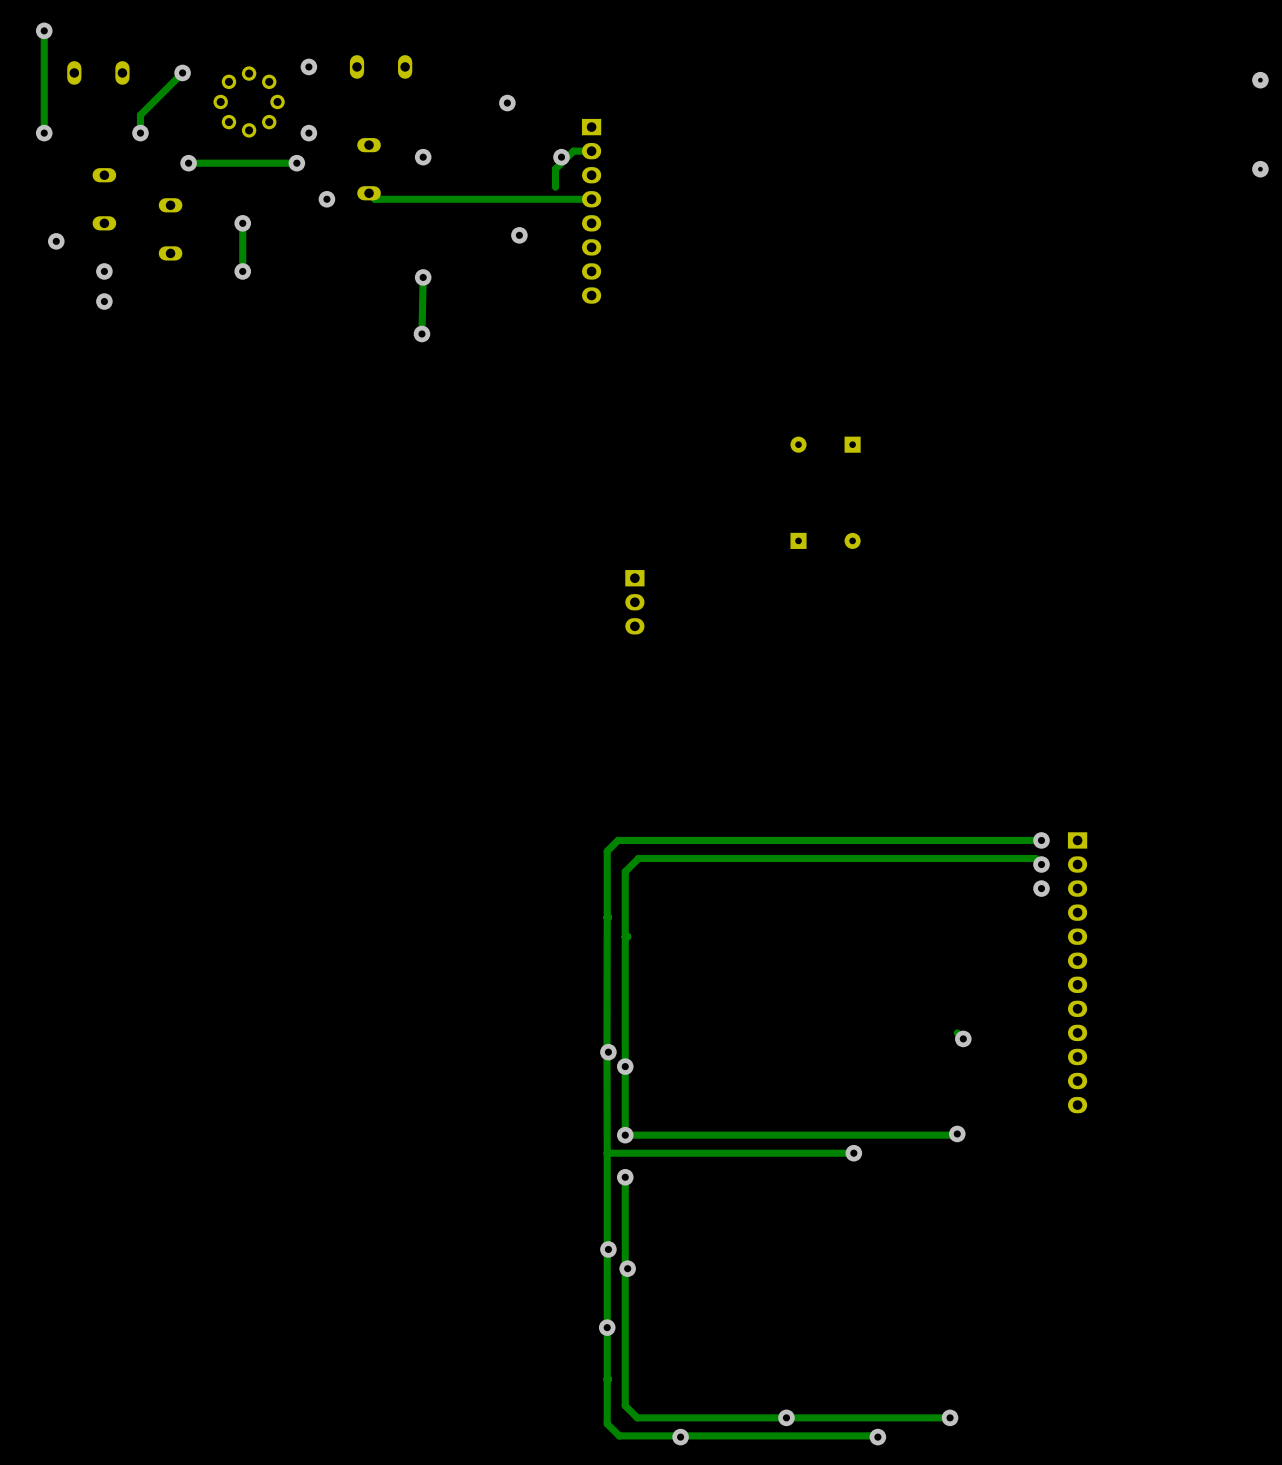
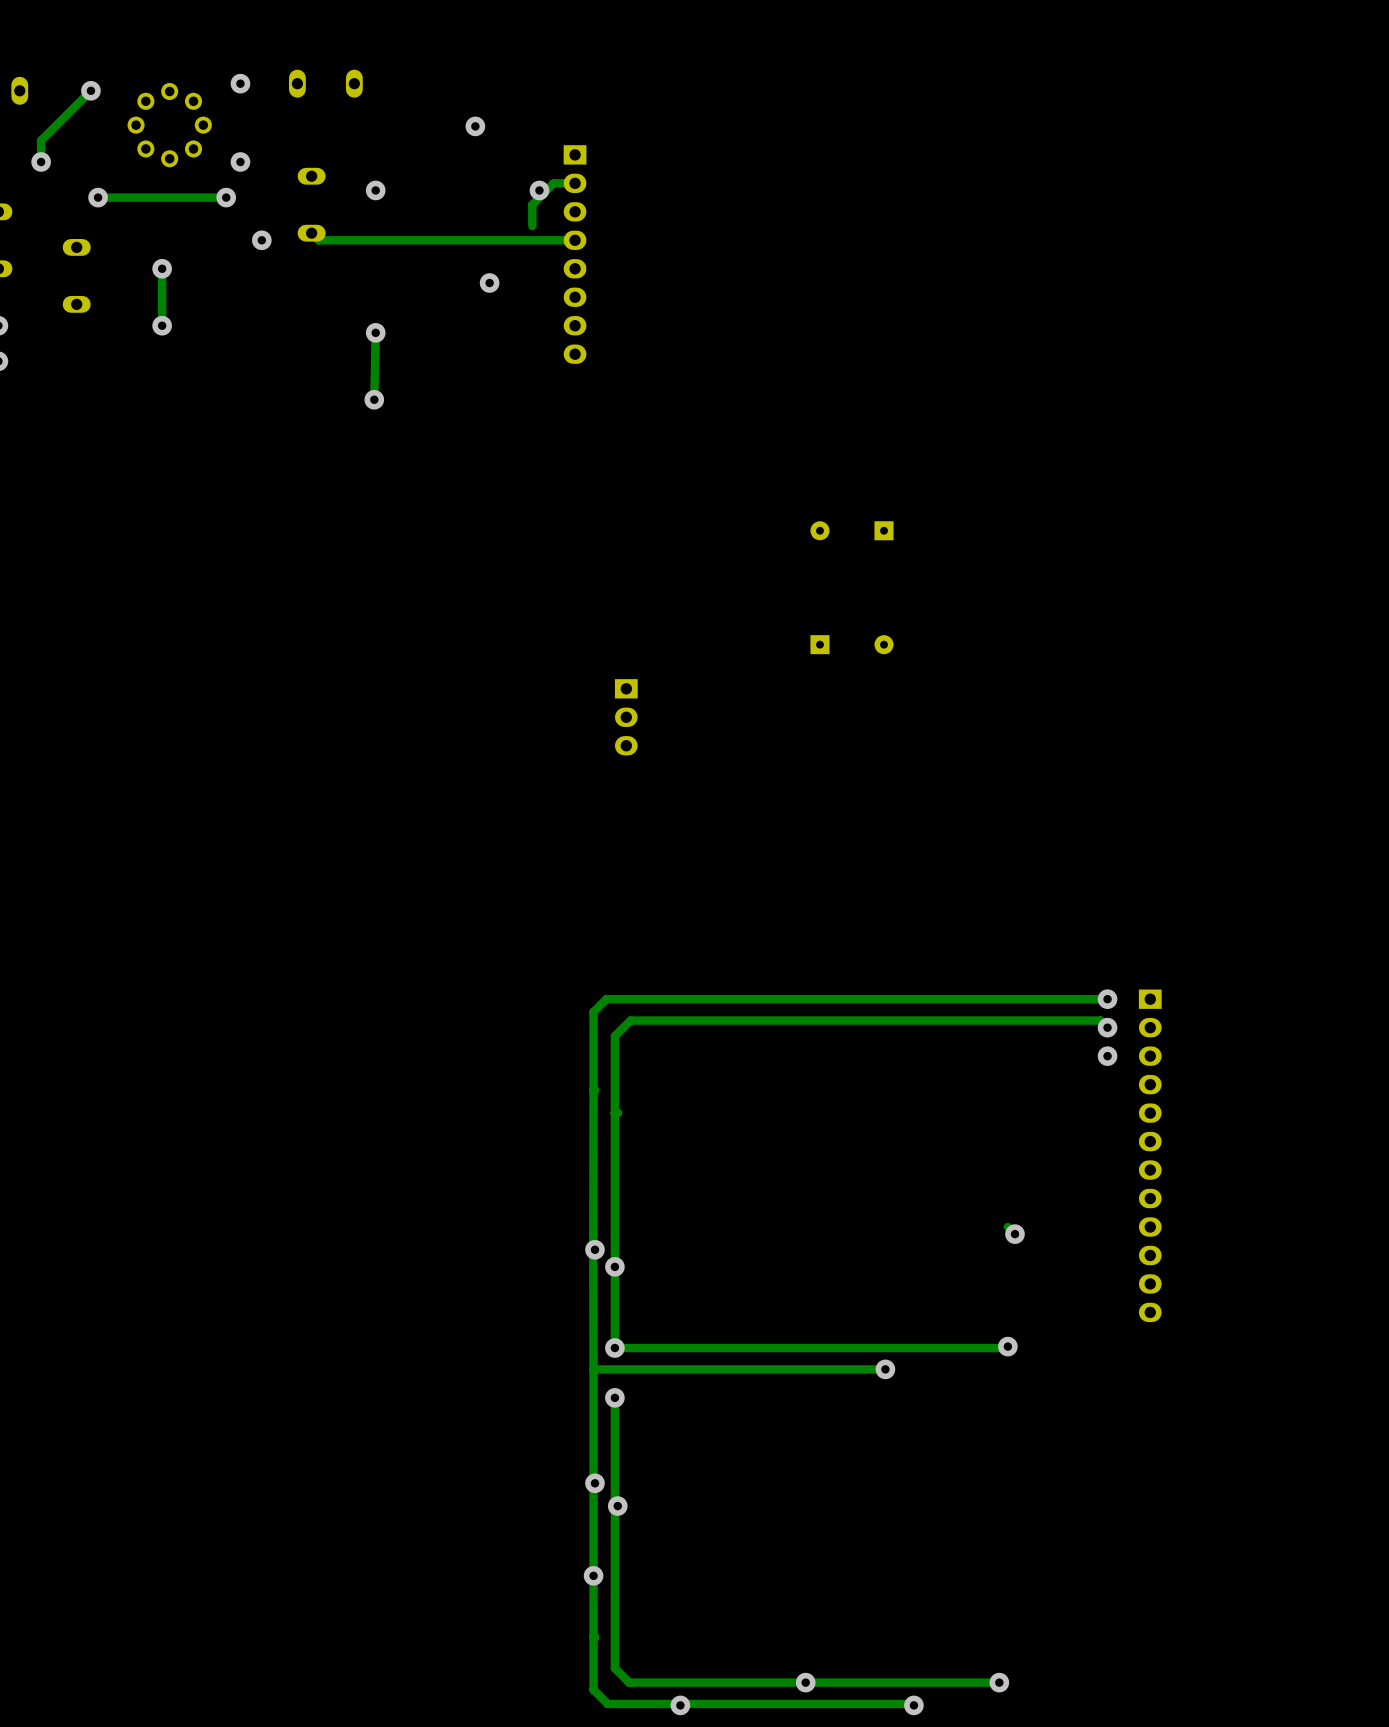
via: (1260, 80) -> none
via: (1260, 169) -> none

